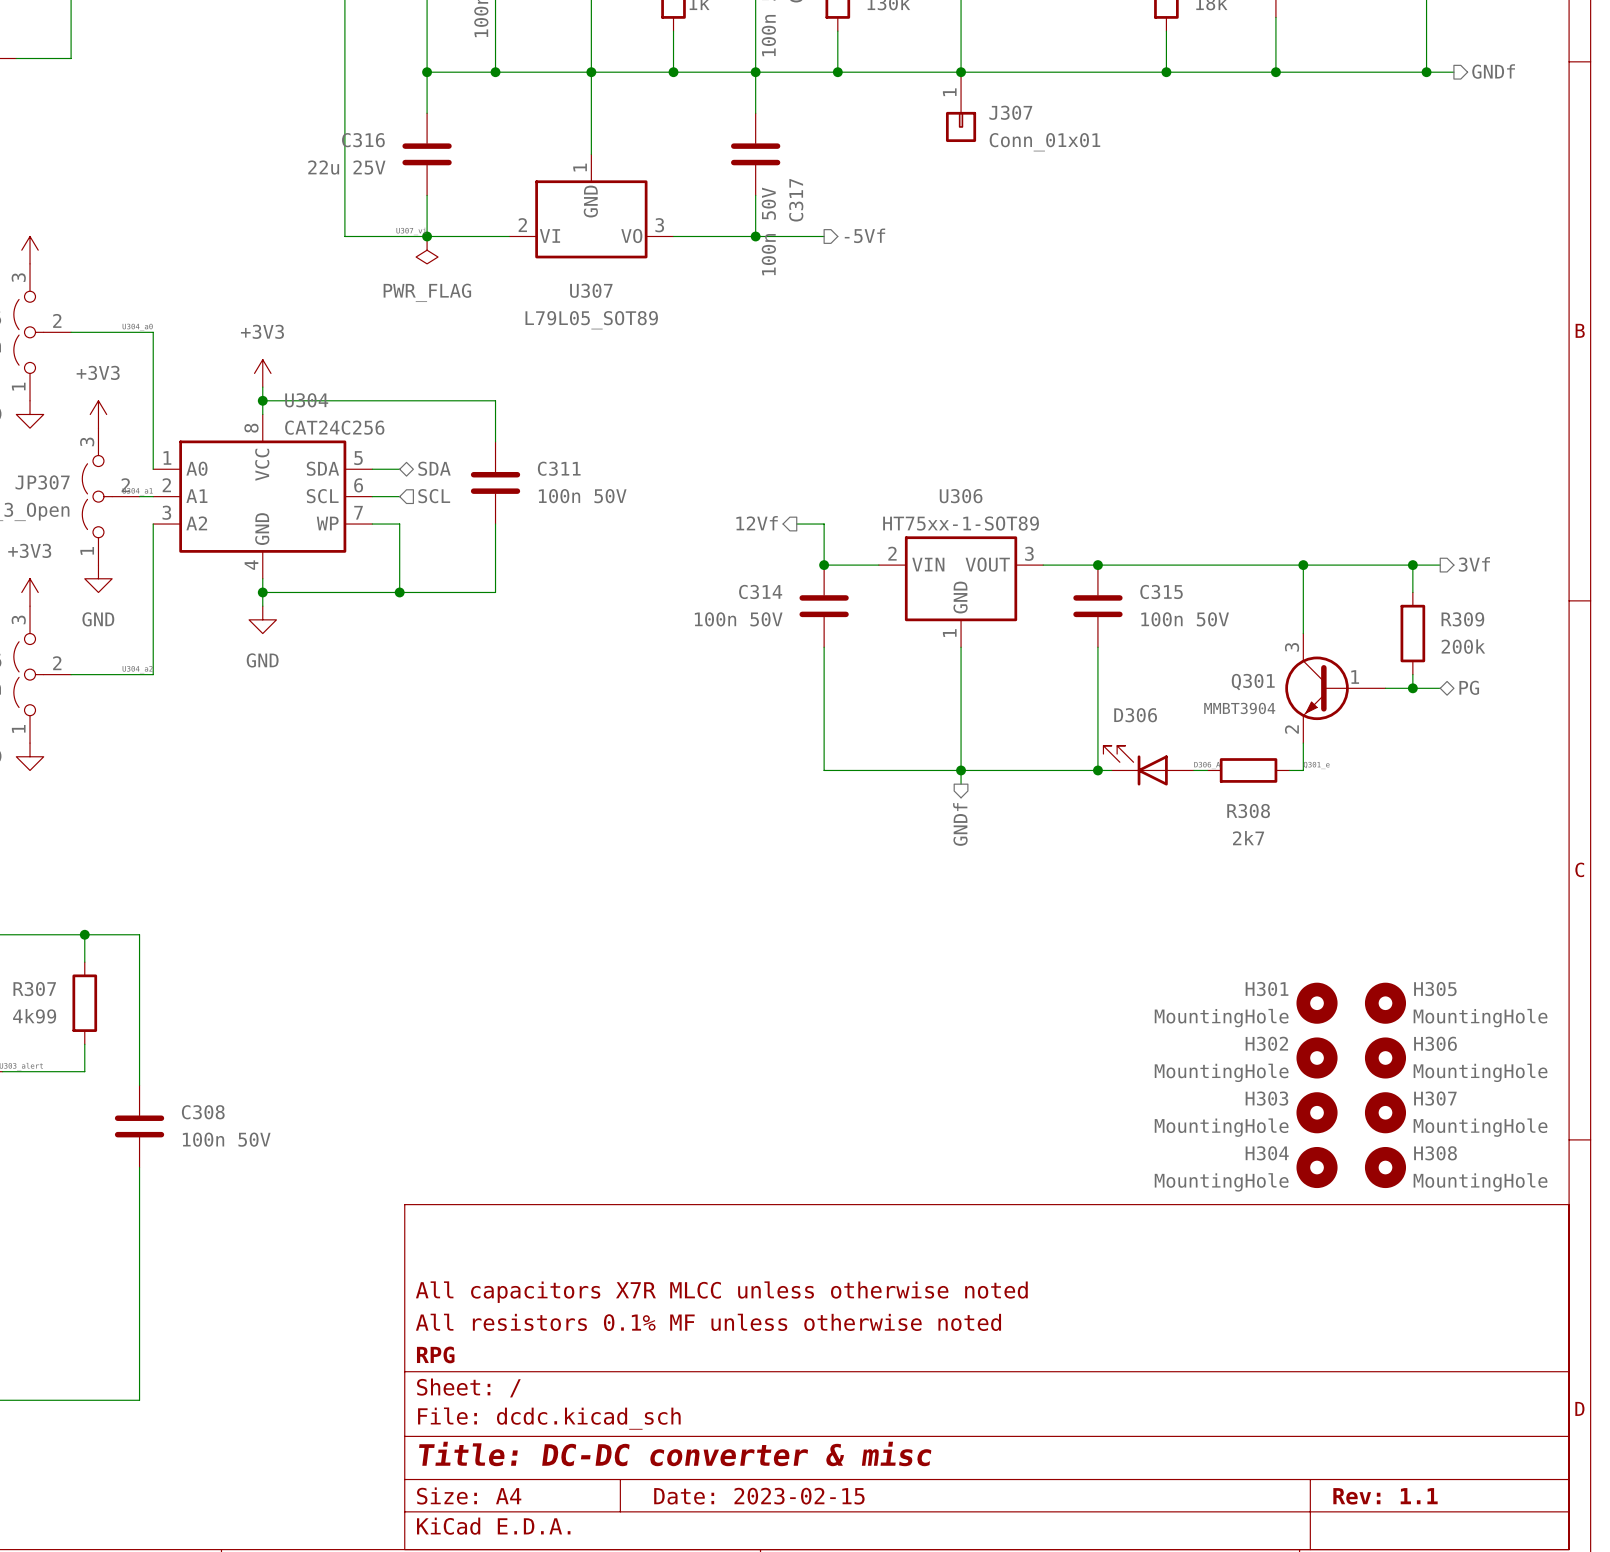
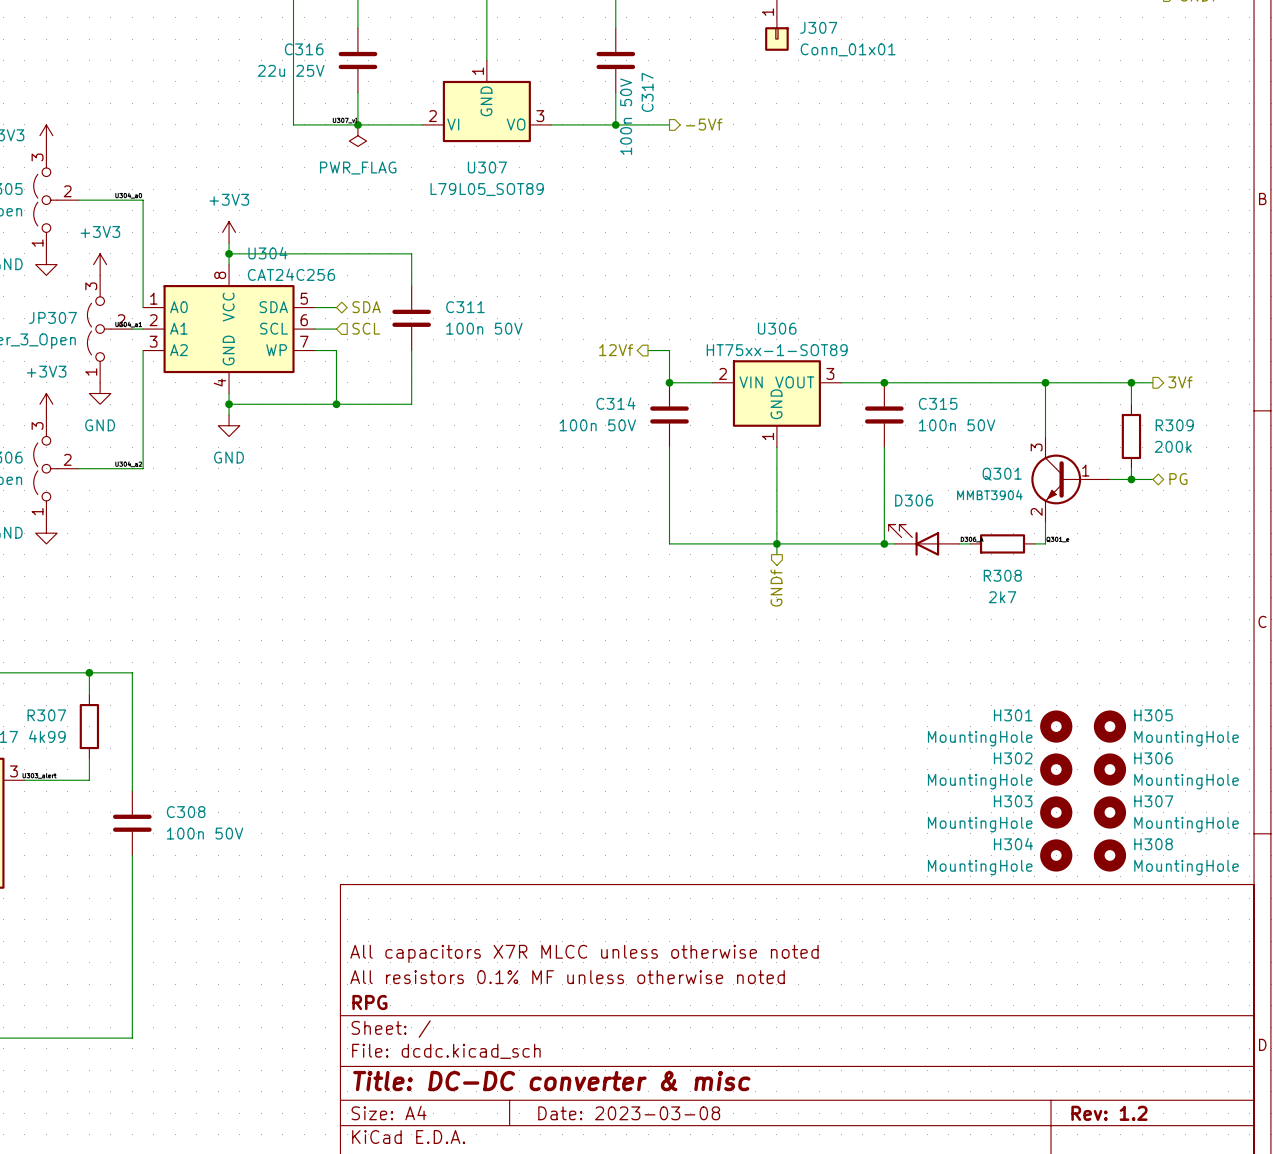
title block: Date: 2023-02-15 (759, 1496) -> Date: 2023-03-08 (629, 1113)
title block: Rev: 1.1 (1385, 1496) -> Rev: 1.2 (1109, 1113)

